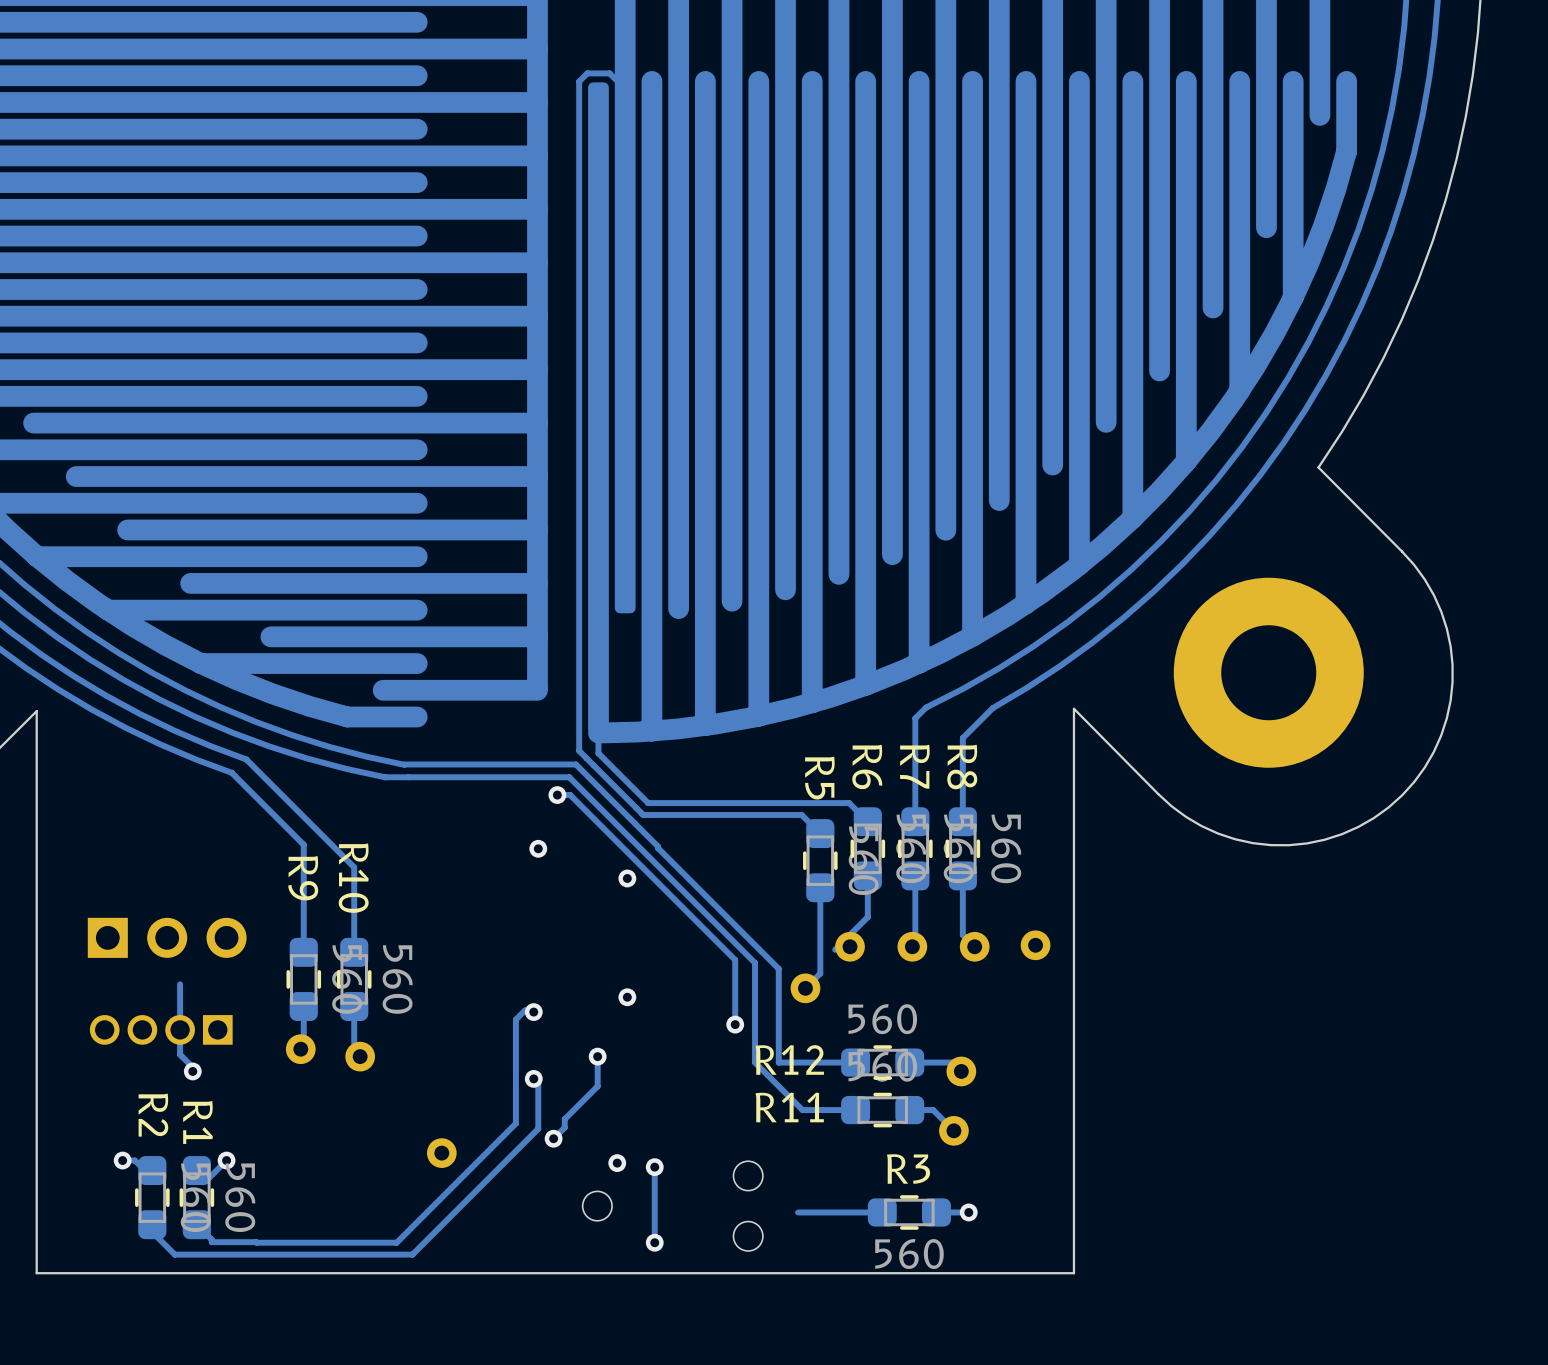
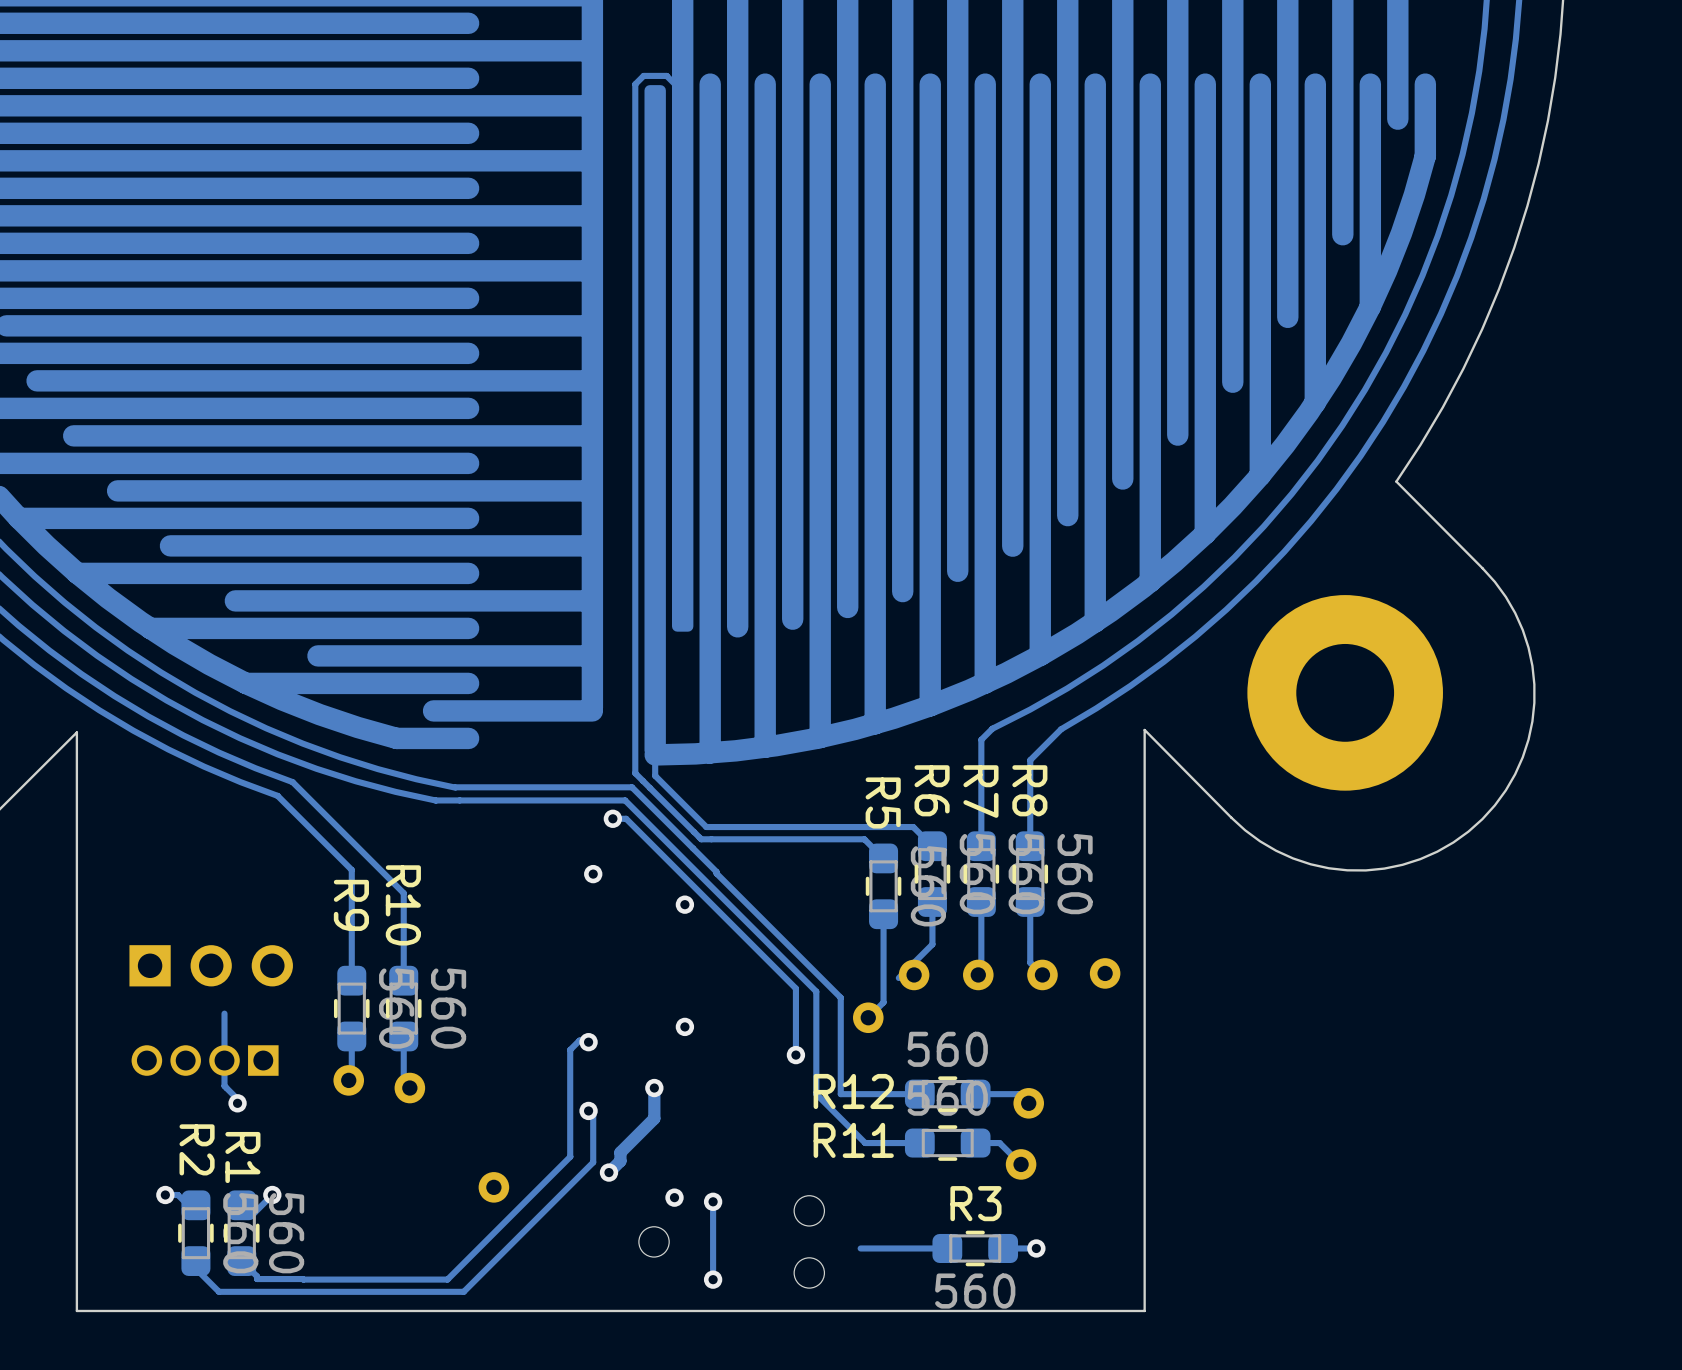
track width: thin (597, 1056) (597, 1086) (564, 1119) (564, 1127) (553, 1138) -> thick (654, 1088) (654, 1118) (620, 1152) (620, 1161) (608, 1172)

